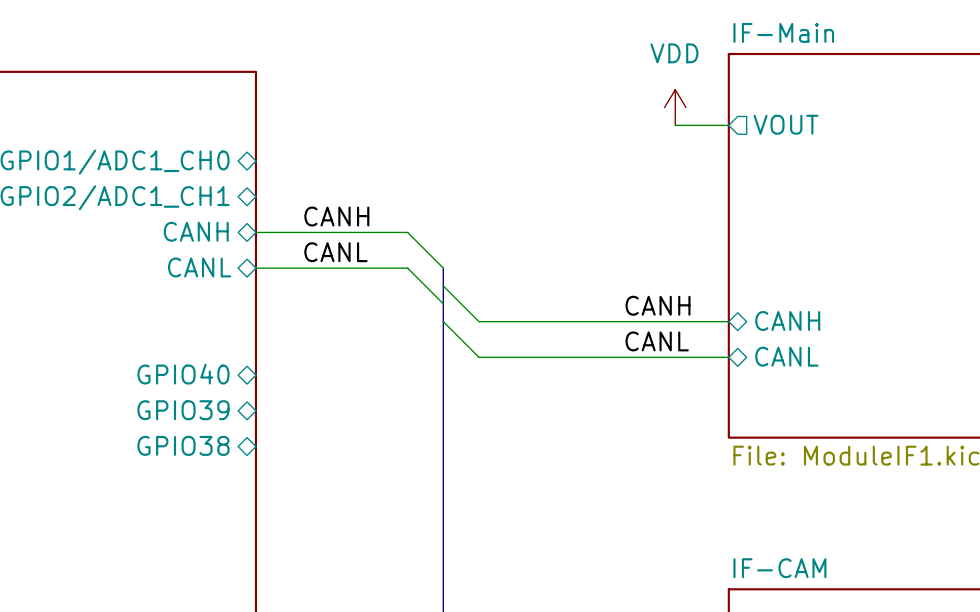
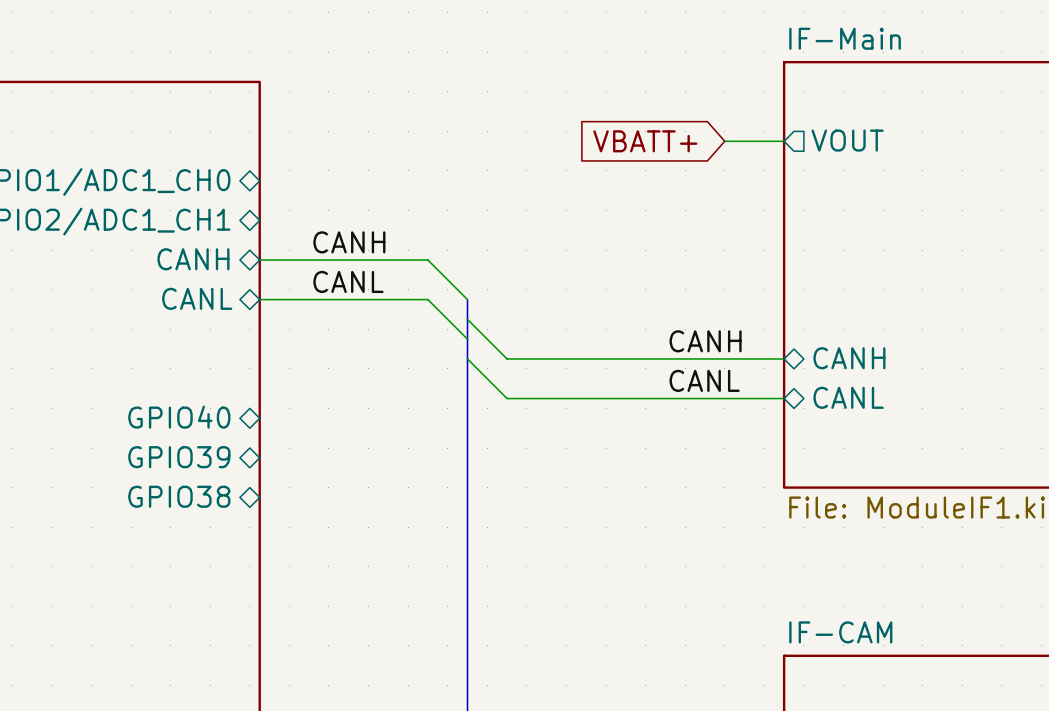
power symbol: VDD (675, 107) -> none
global label: none -> VBATT+ (645, 141)

